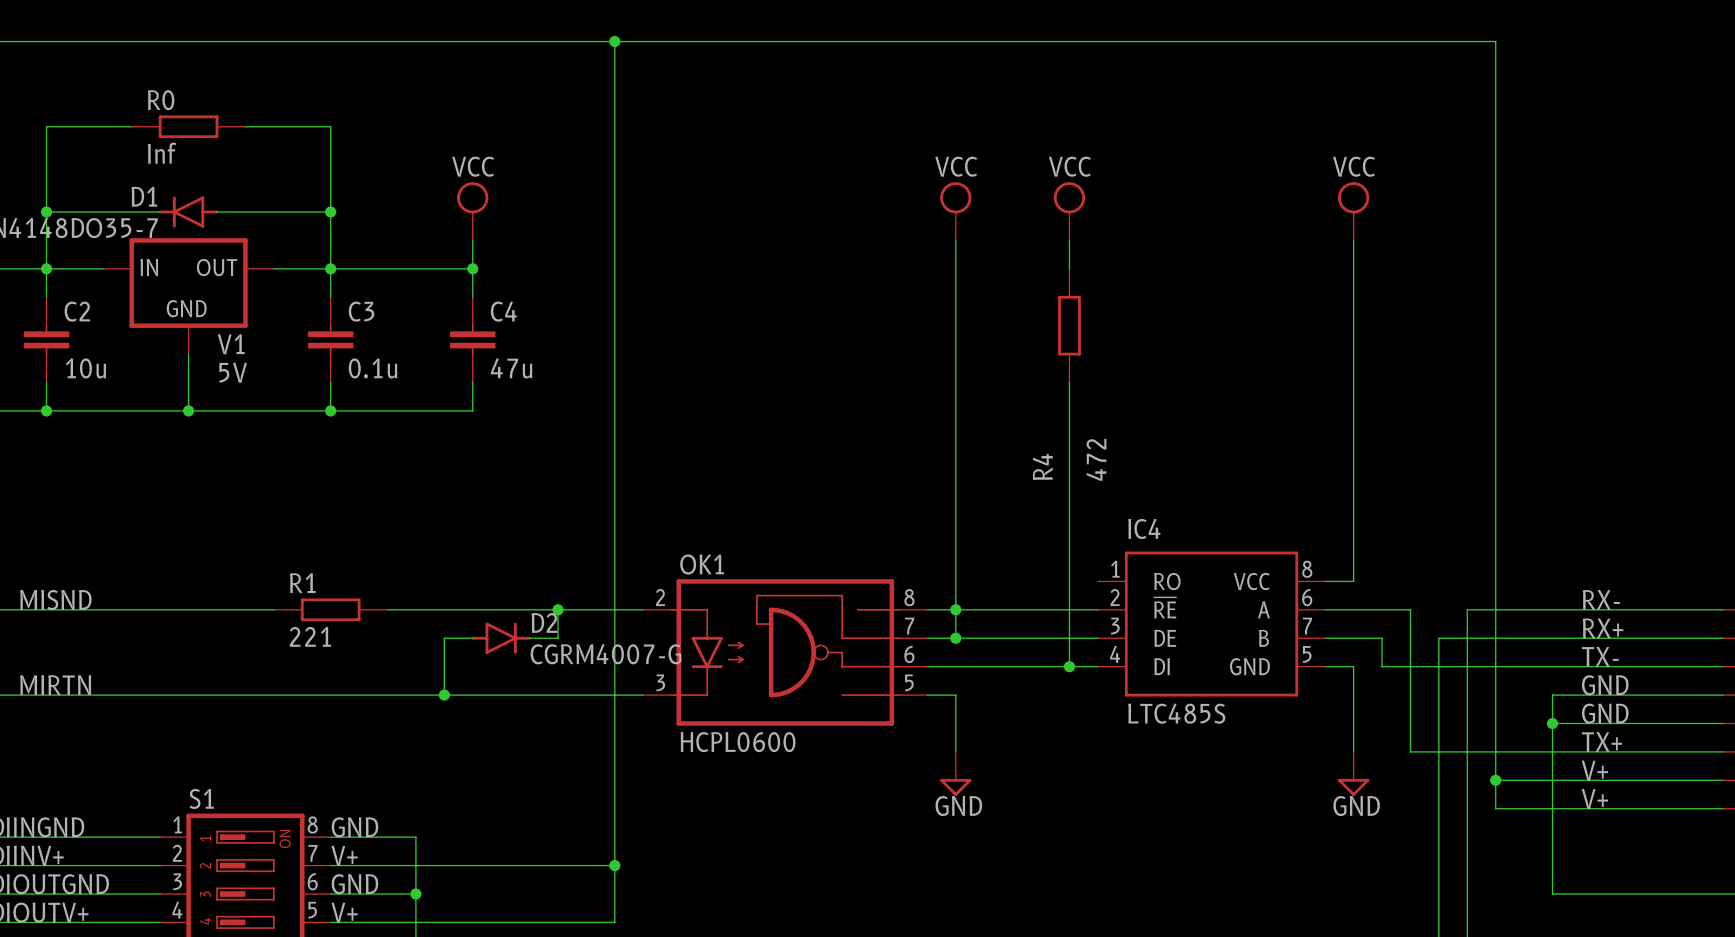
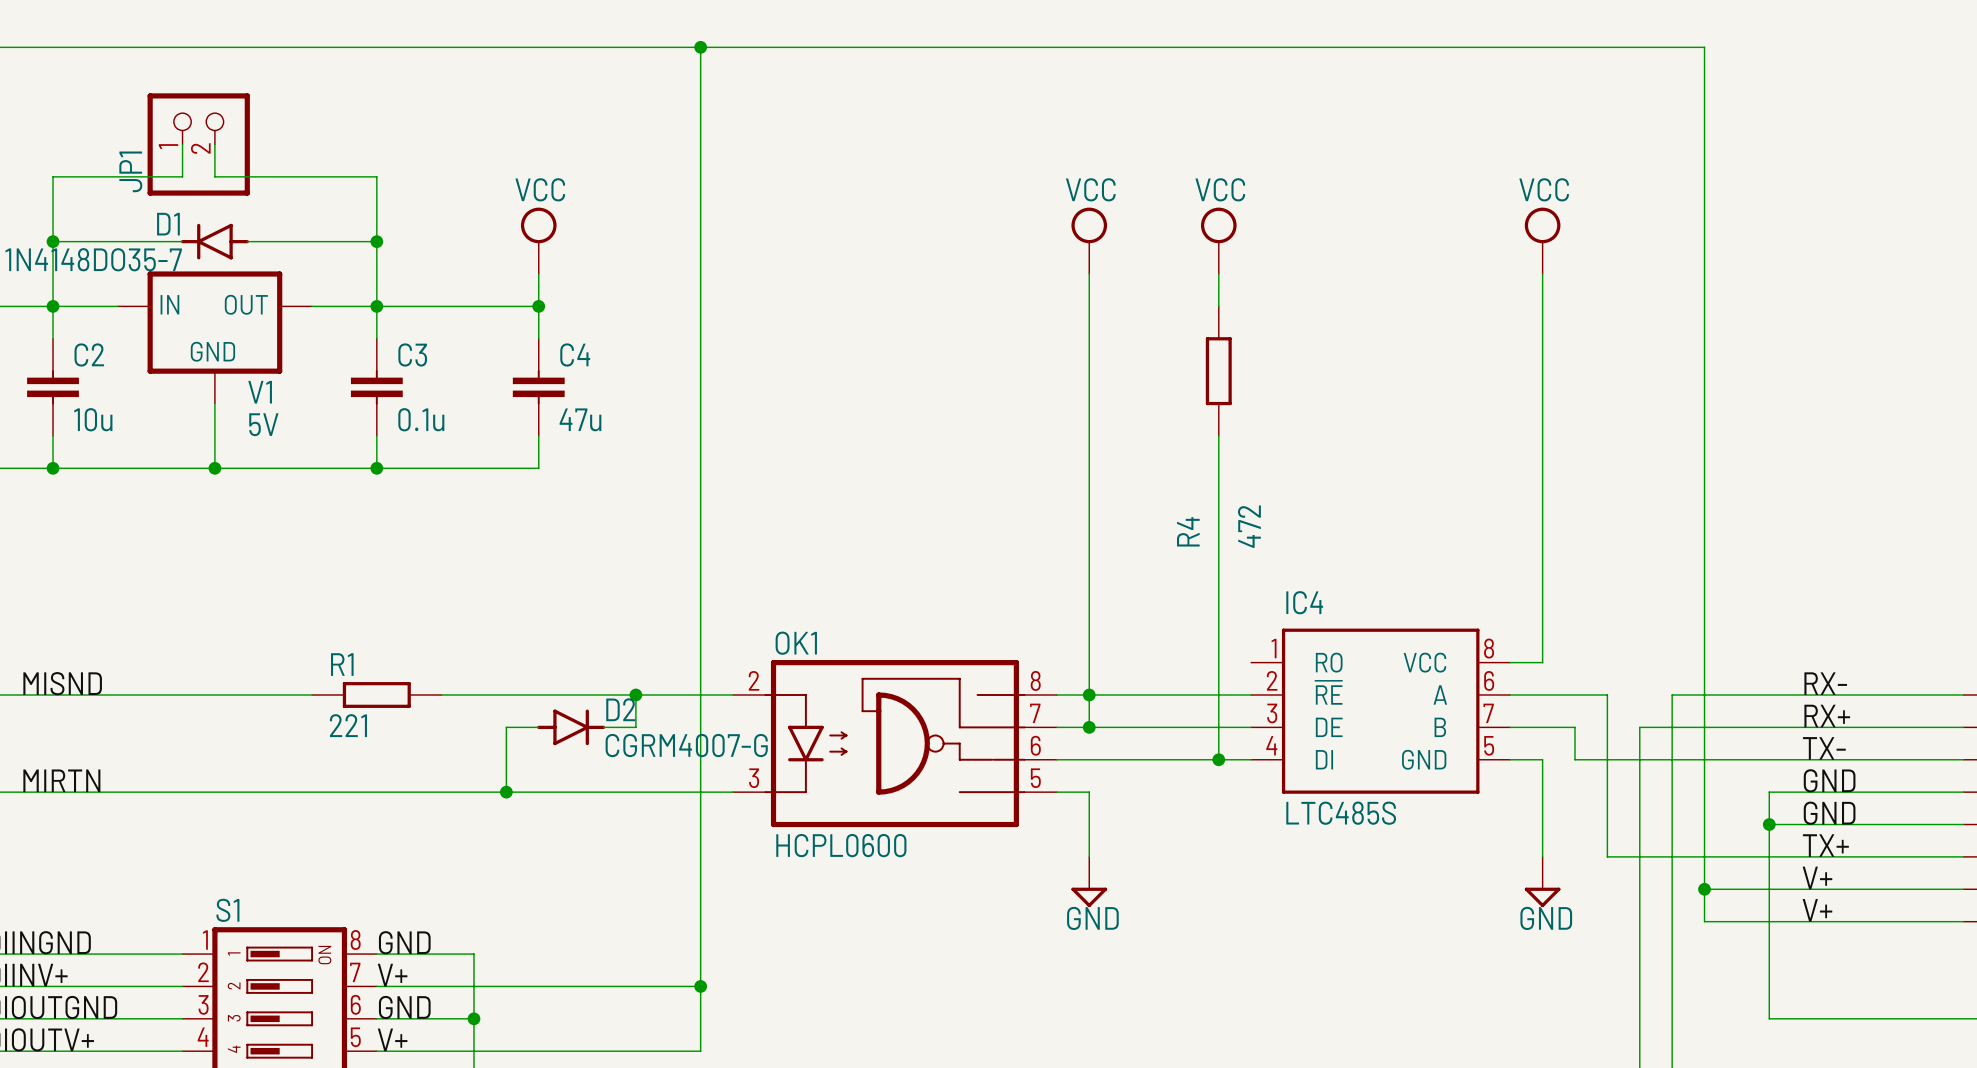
wire: (131, 126) (46, 126) (46, 155) -> (182, 144) (182, 176) (53, 176)
JP1: none -> (198, 144)
R0: Inf (188, 126) -> none
wire: (245, 126) (330, 126) (330, 155) -> (214, 144) (214, 176) (376, 176)

